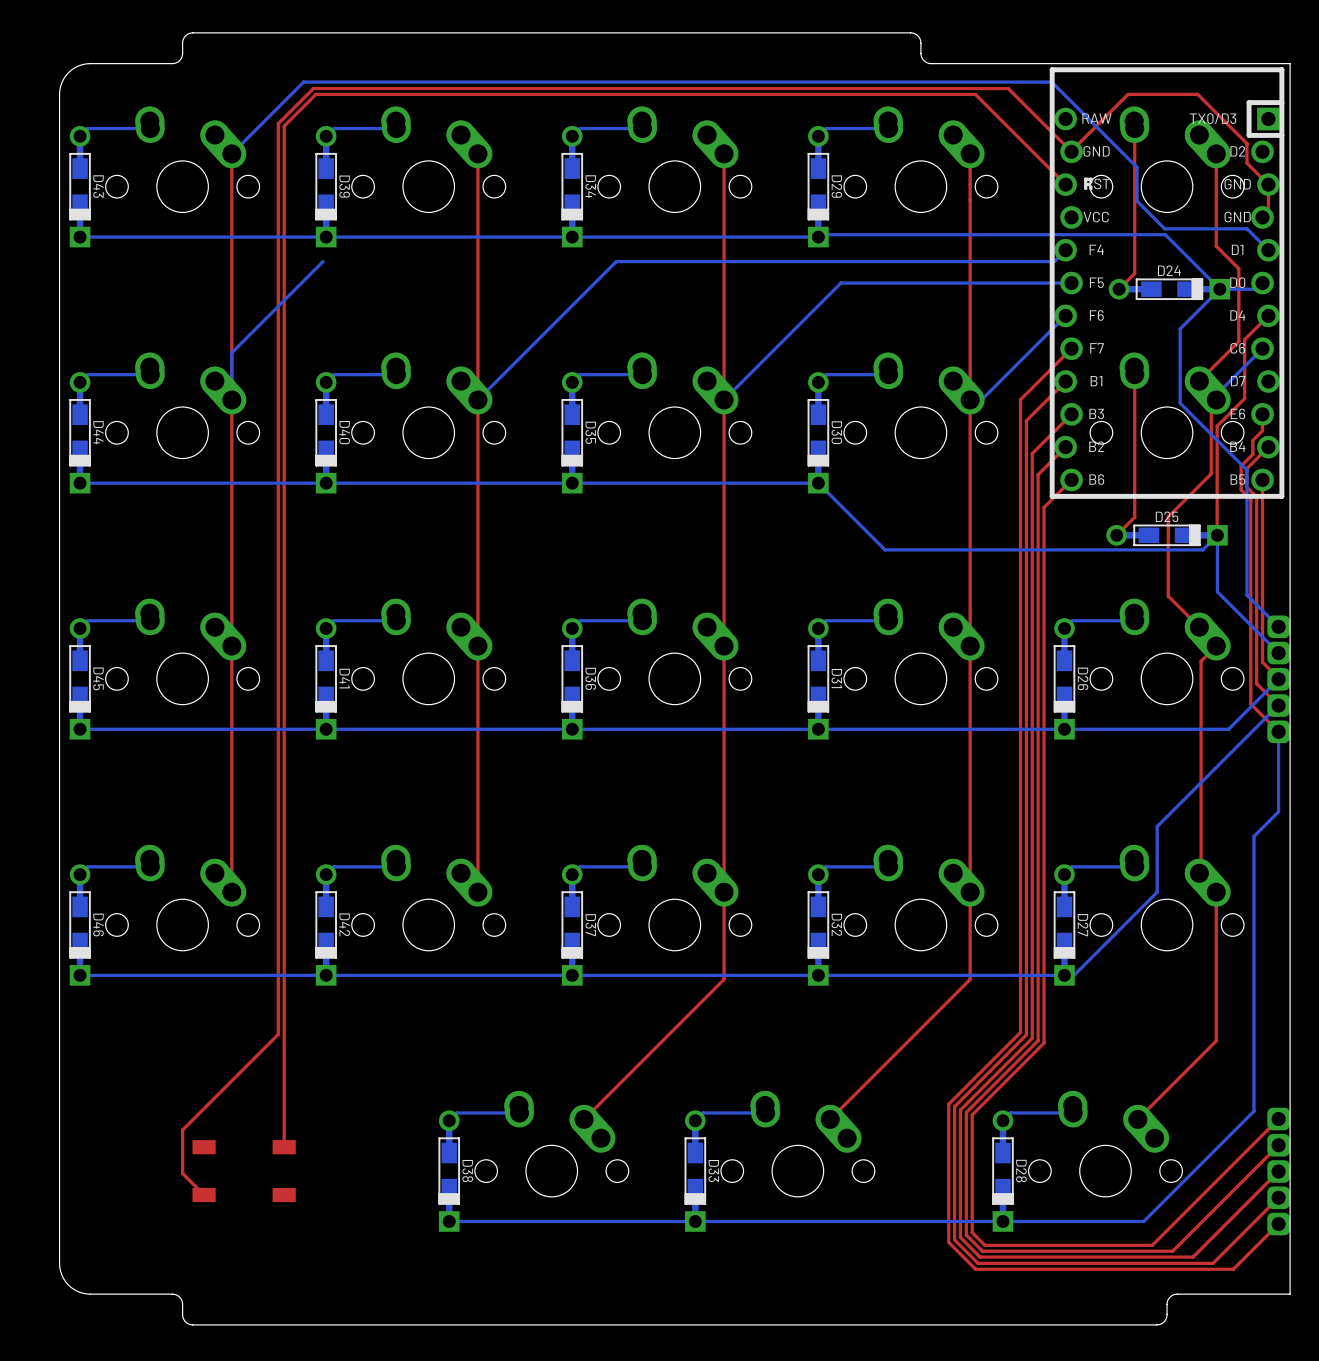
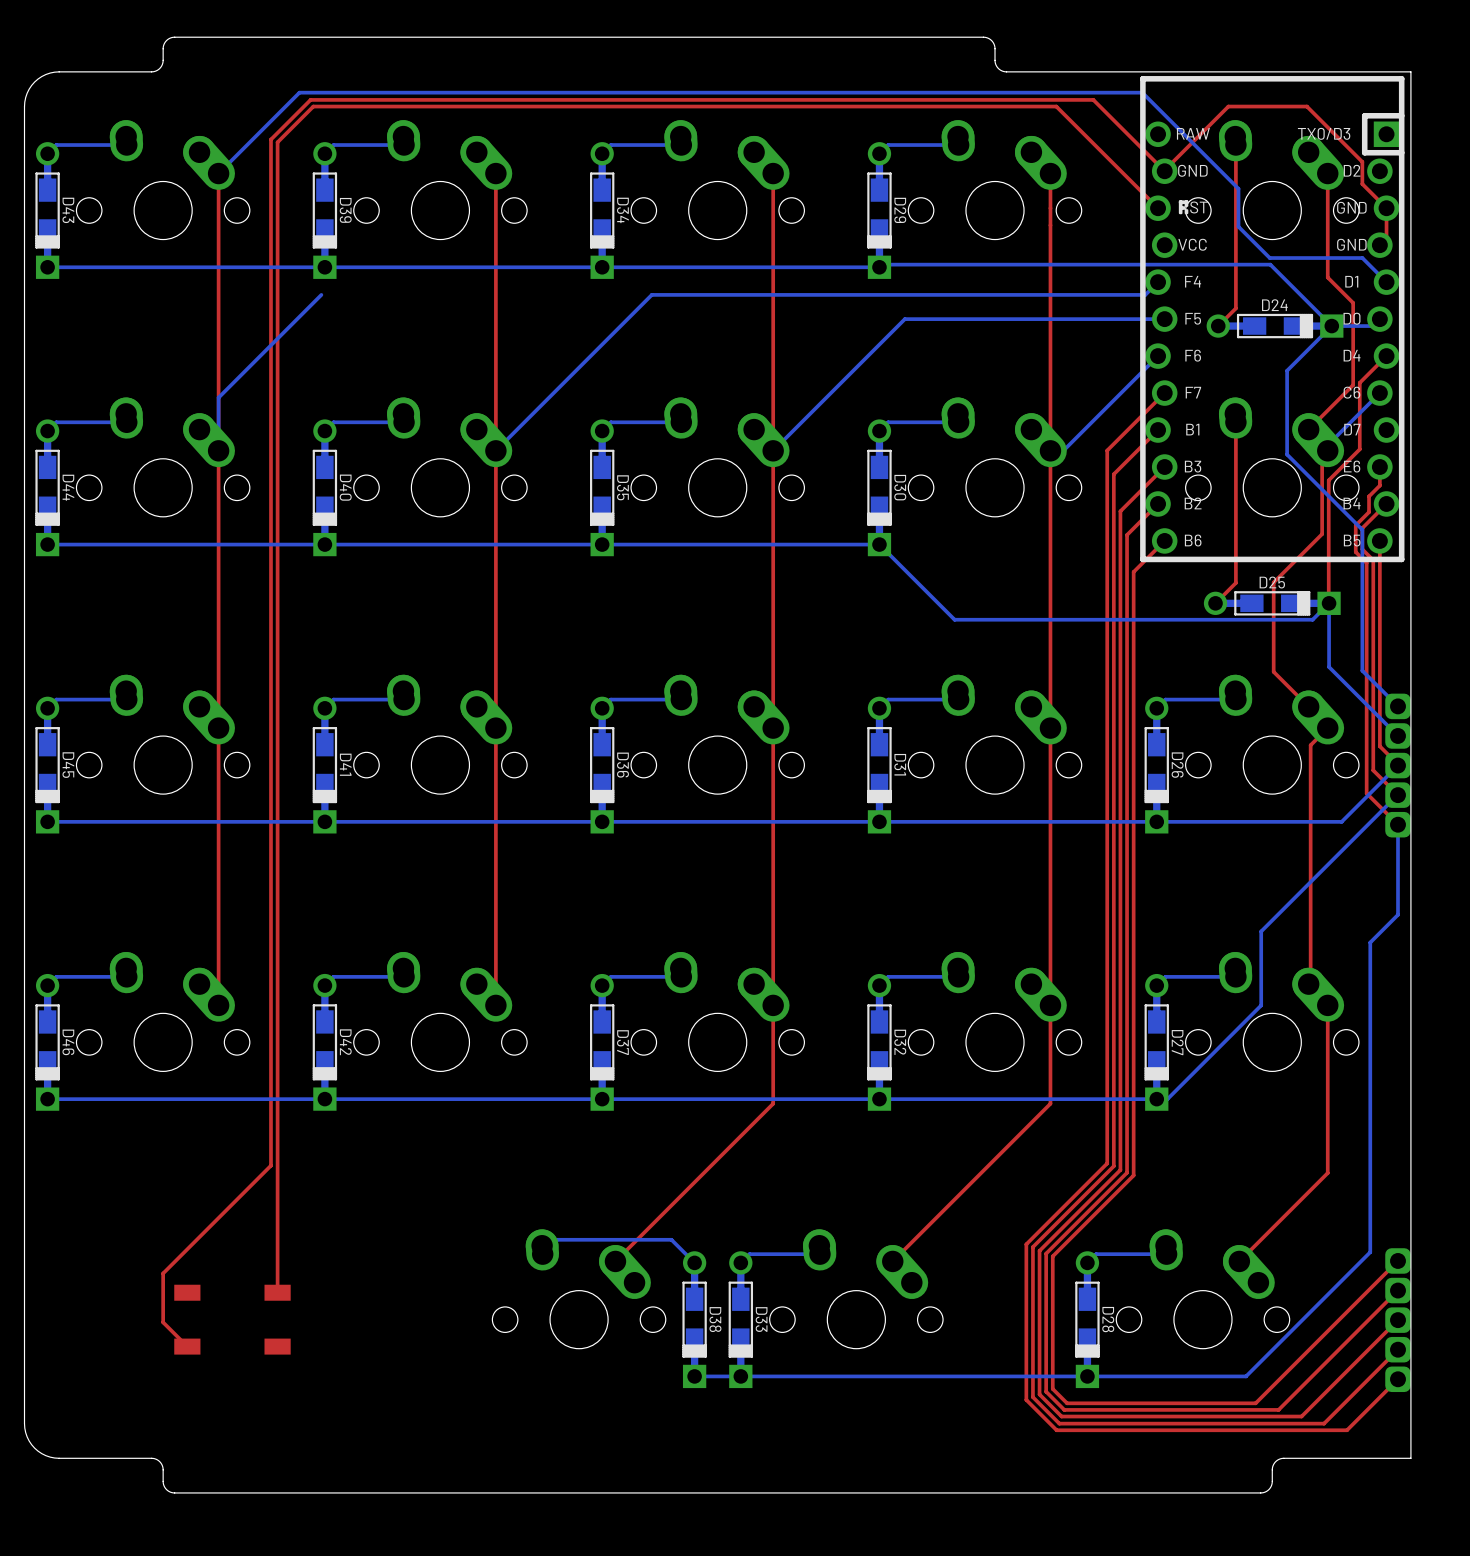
bottom track: (519, 1112) (456, 1112) (449, 1120) -> (542, 1254) (557, 1239) (671, 1239) (694, 1262)
D38 position: (449, 1171) -> (694, 1319)
bottom track: (654, 1221) (449, 1221) -> none

